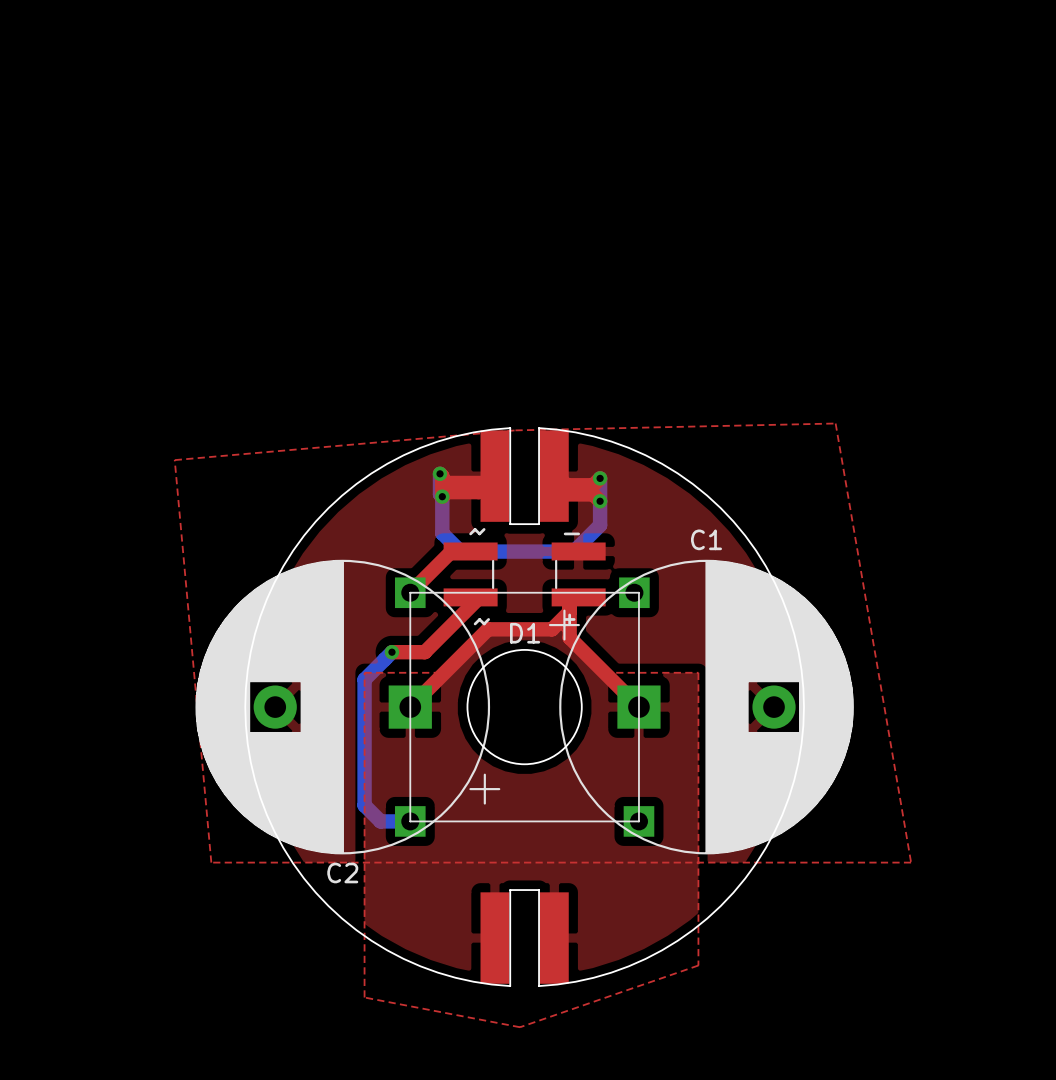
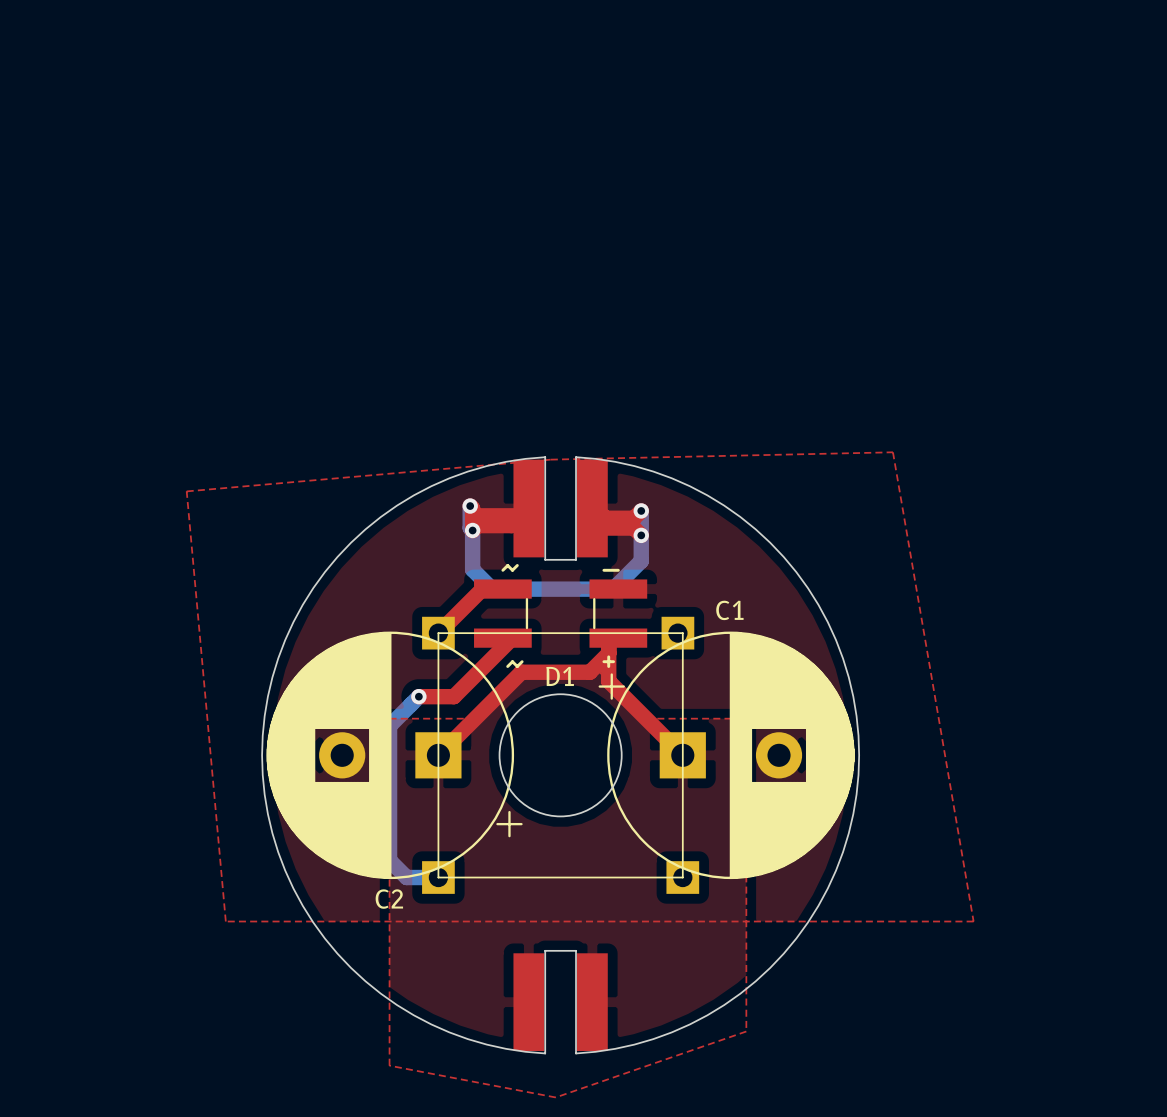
C2 footprint: [195, 559, 501, 855] -> [266, 631, 523, 880]
C1 footprint: [548, 559, 854, 855] -> [598, 631, 855, 880]

